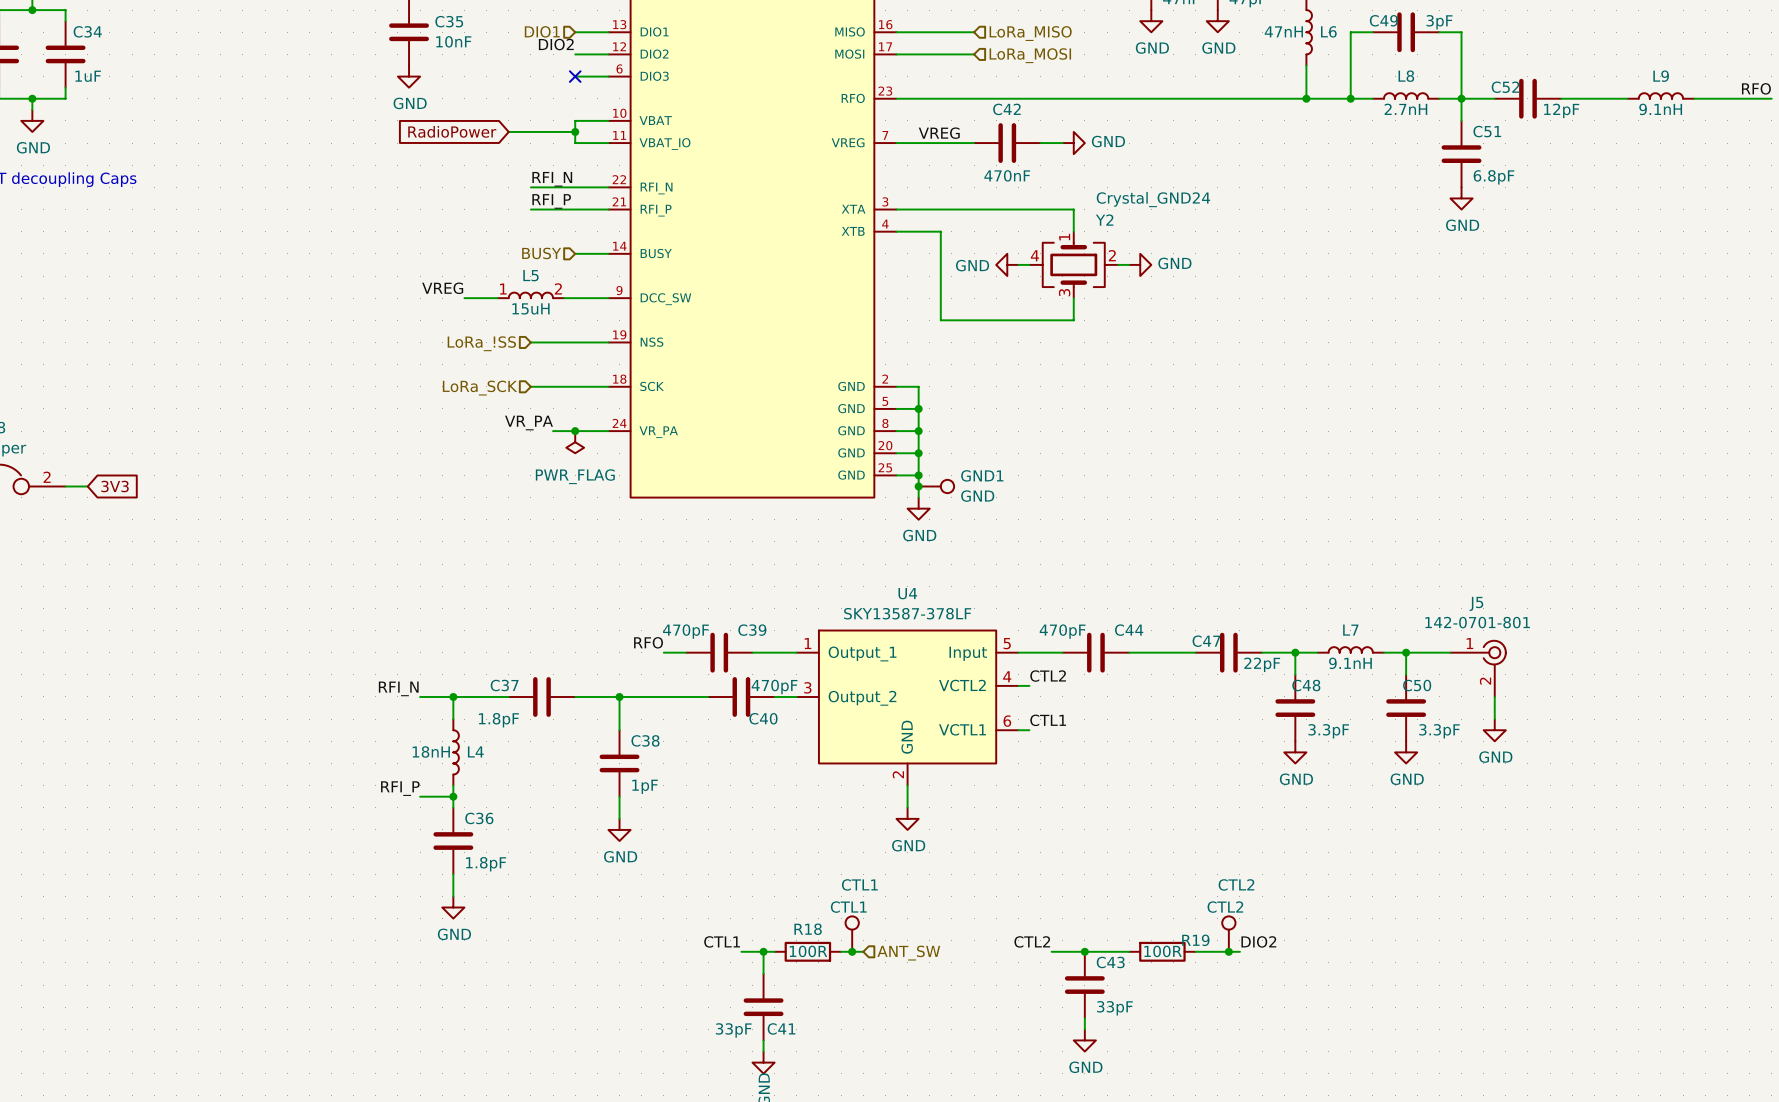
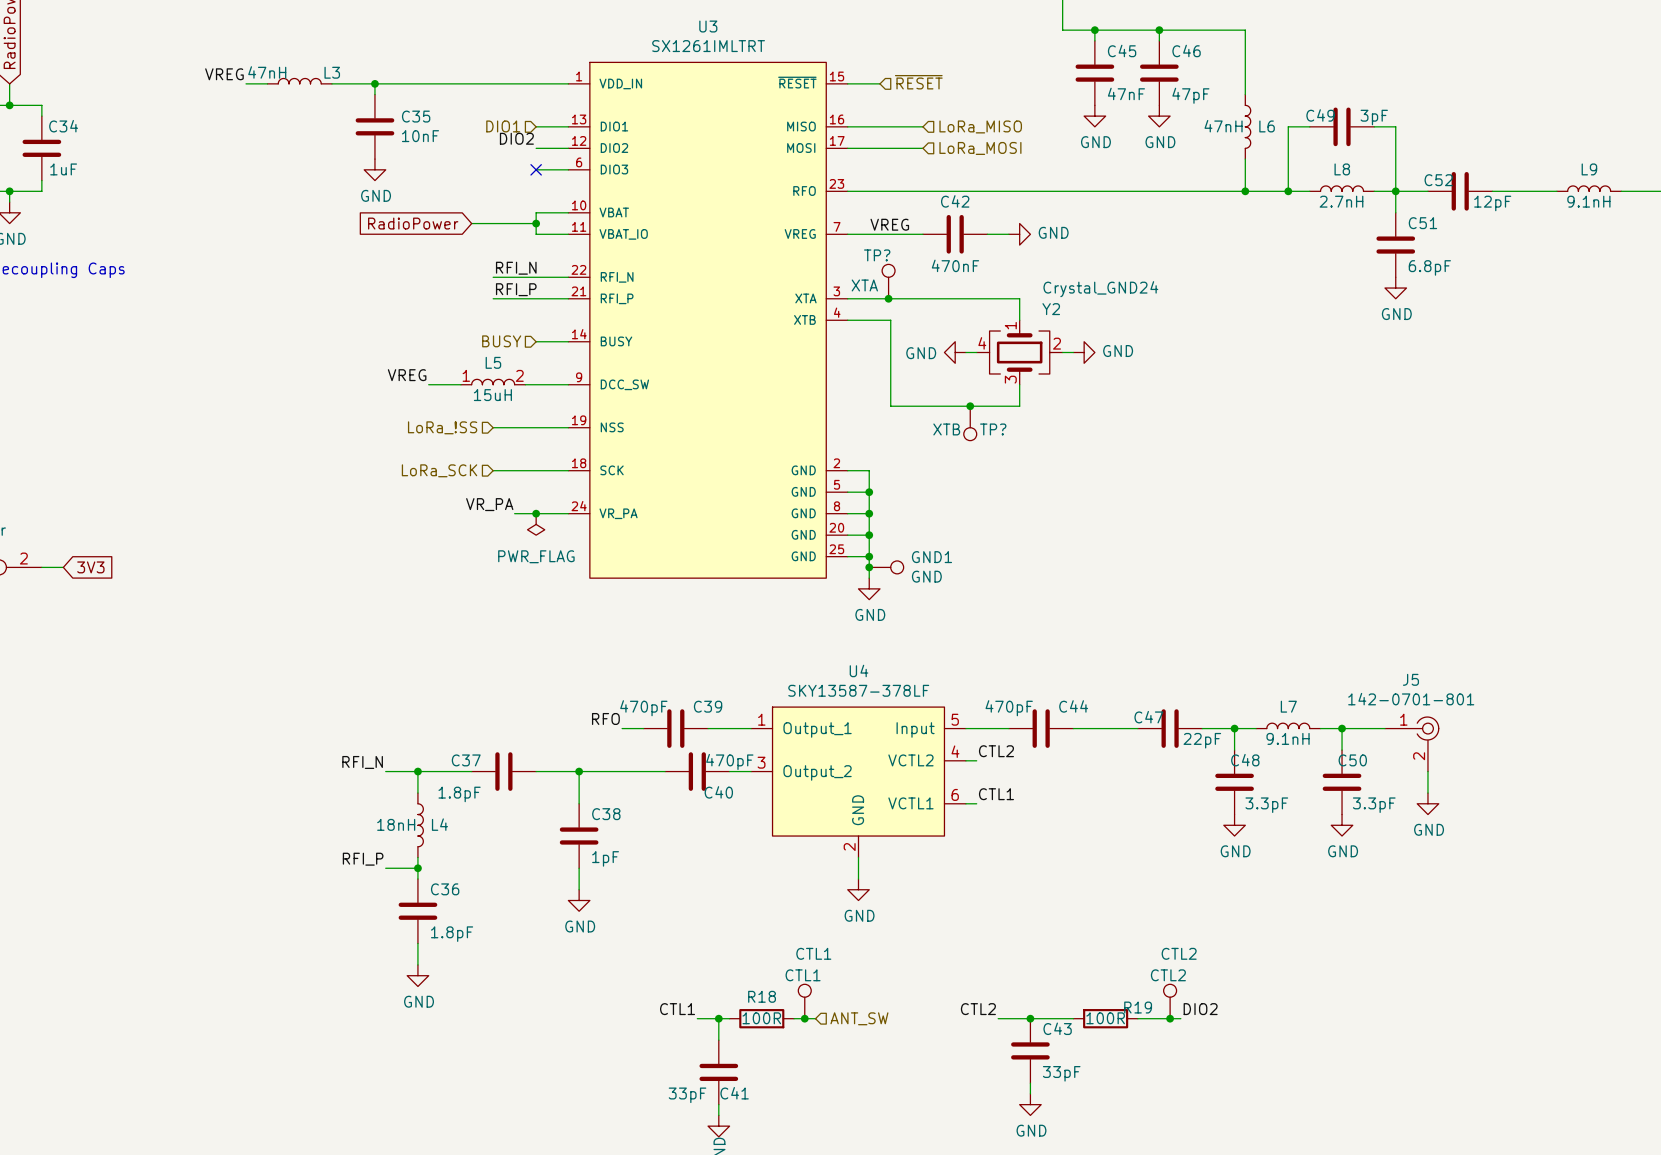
TP?: none -> XTA (888, 281)
junction: none -> (888, 298)
junction: none -> (970, 406)
TP?: none -> XTB (970, 423)

